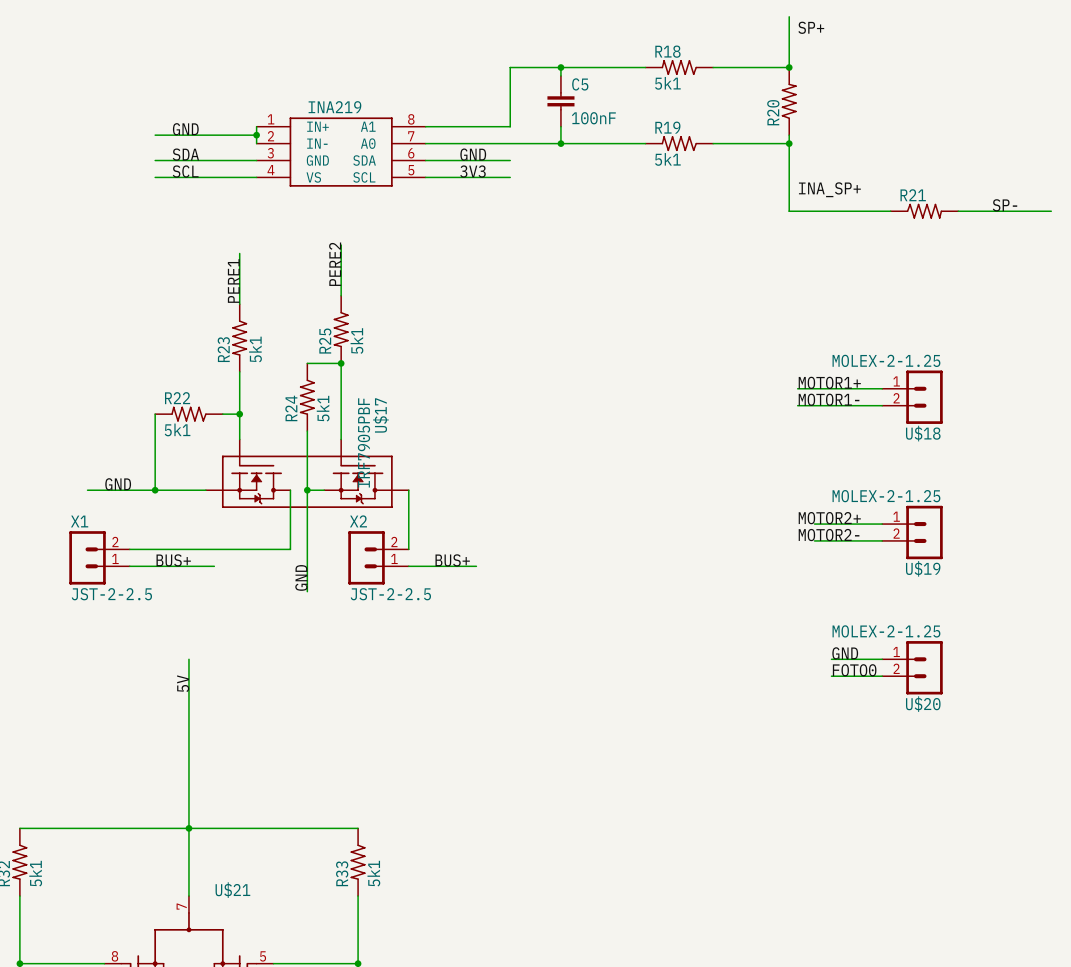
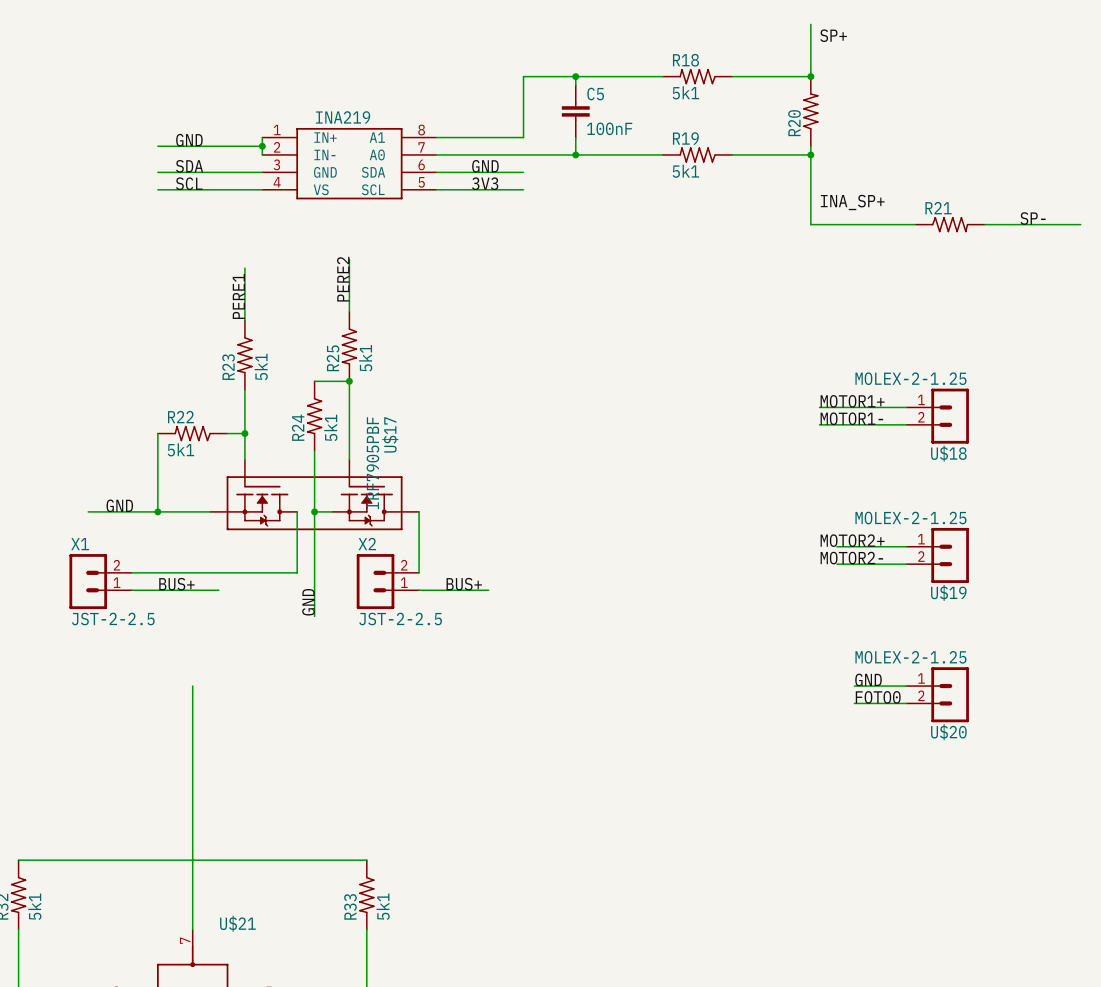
label: 5V (183, 683) -> none
junction: (188, 828) -> none

